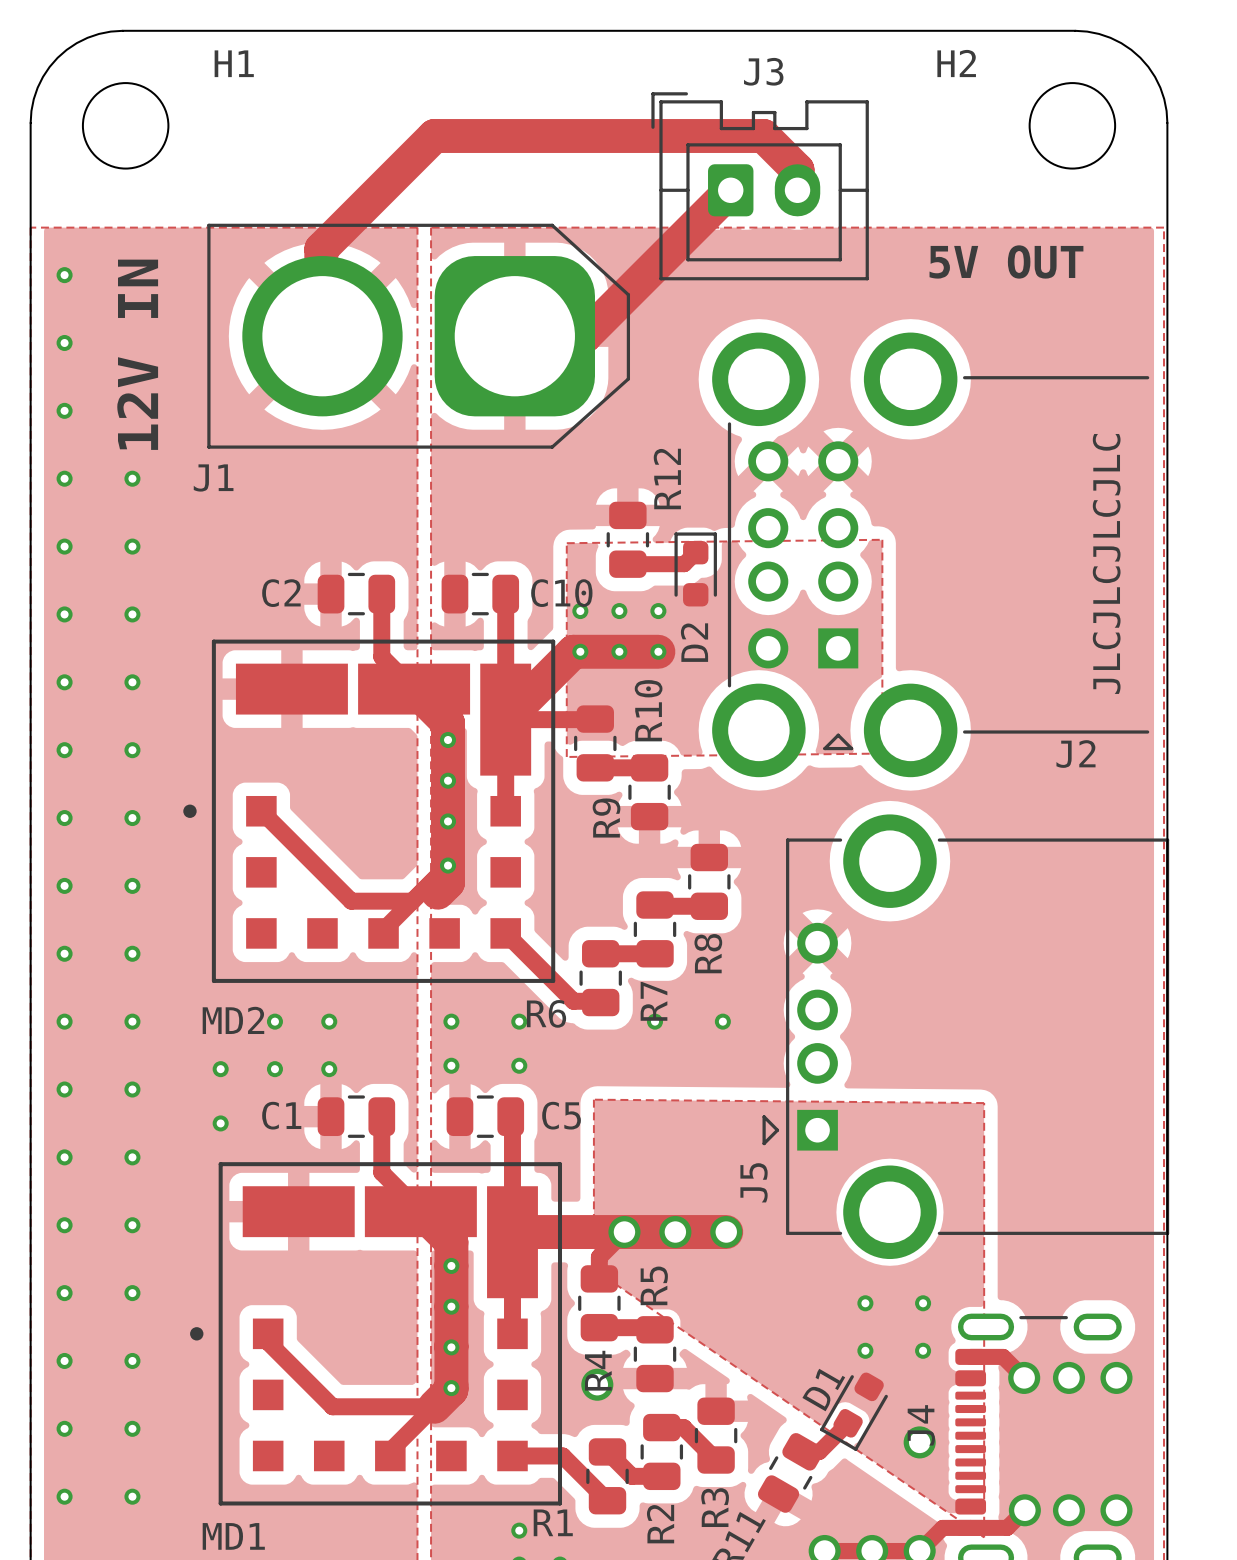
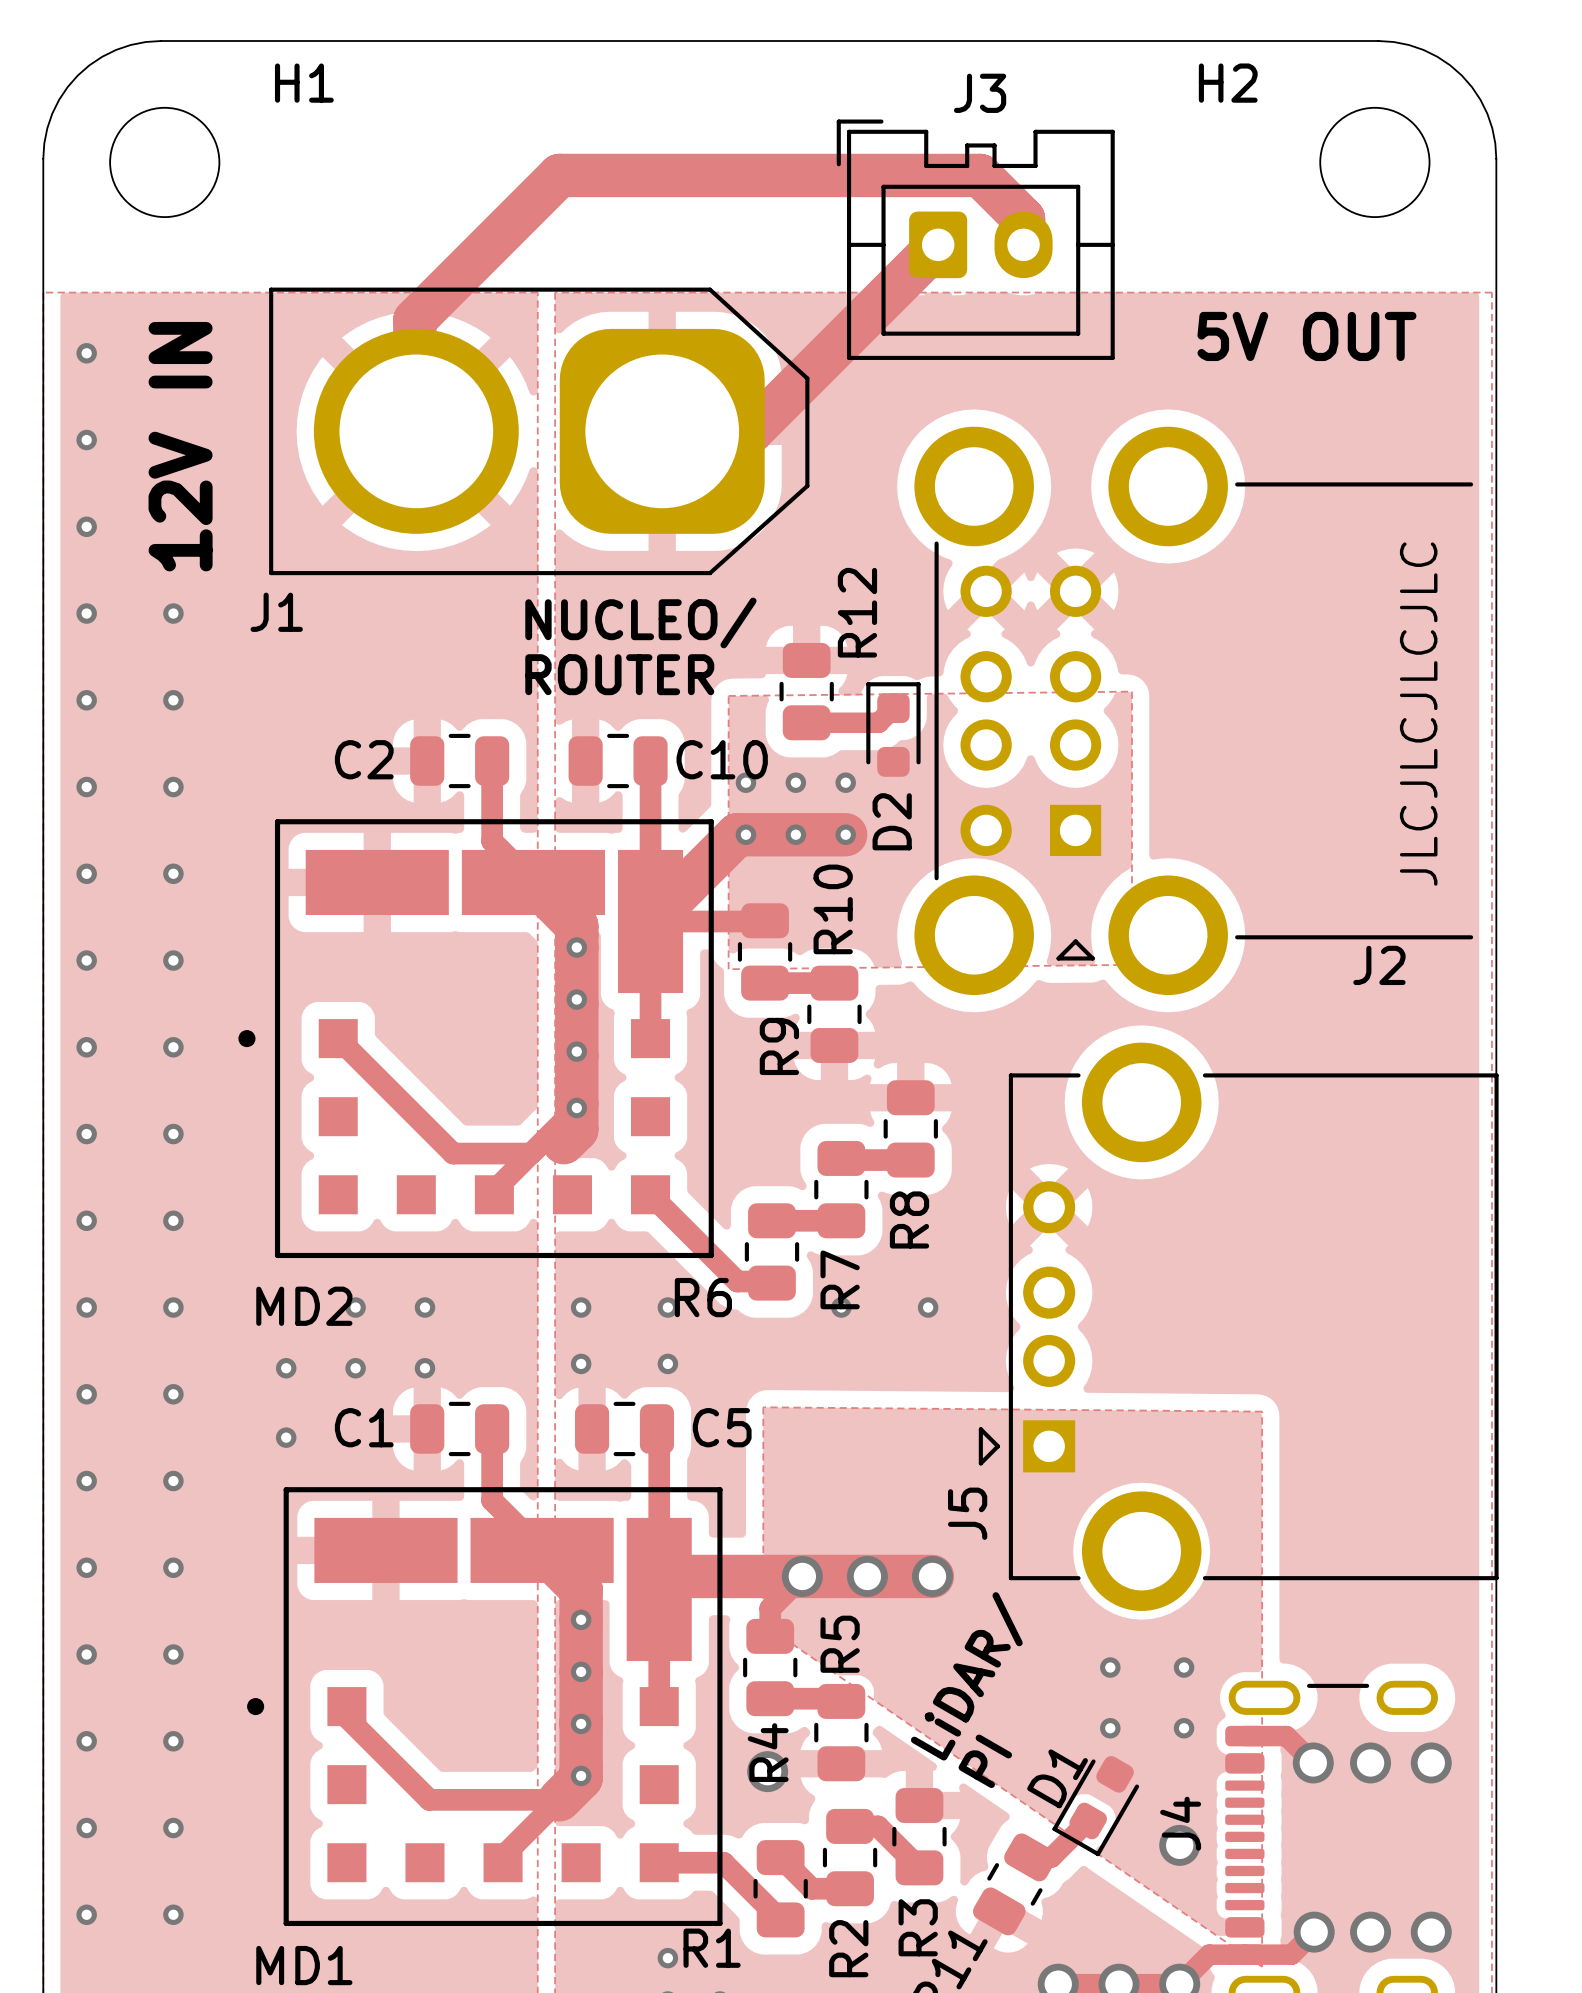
text: none -> NUCLEO/ (640, 622)
text: none -> ROUTER (619, 674)
text: none -> LiDAR/ (966, 1676)
text: none -> PI (985, 1761)

